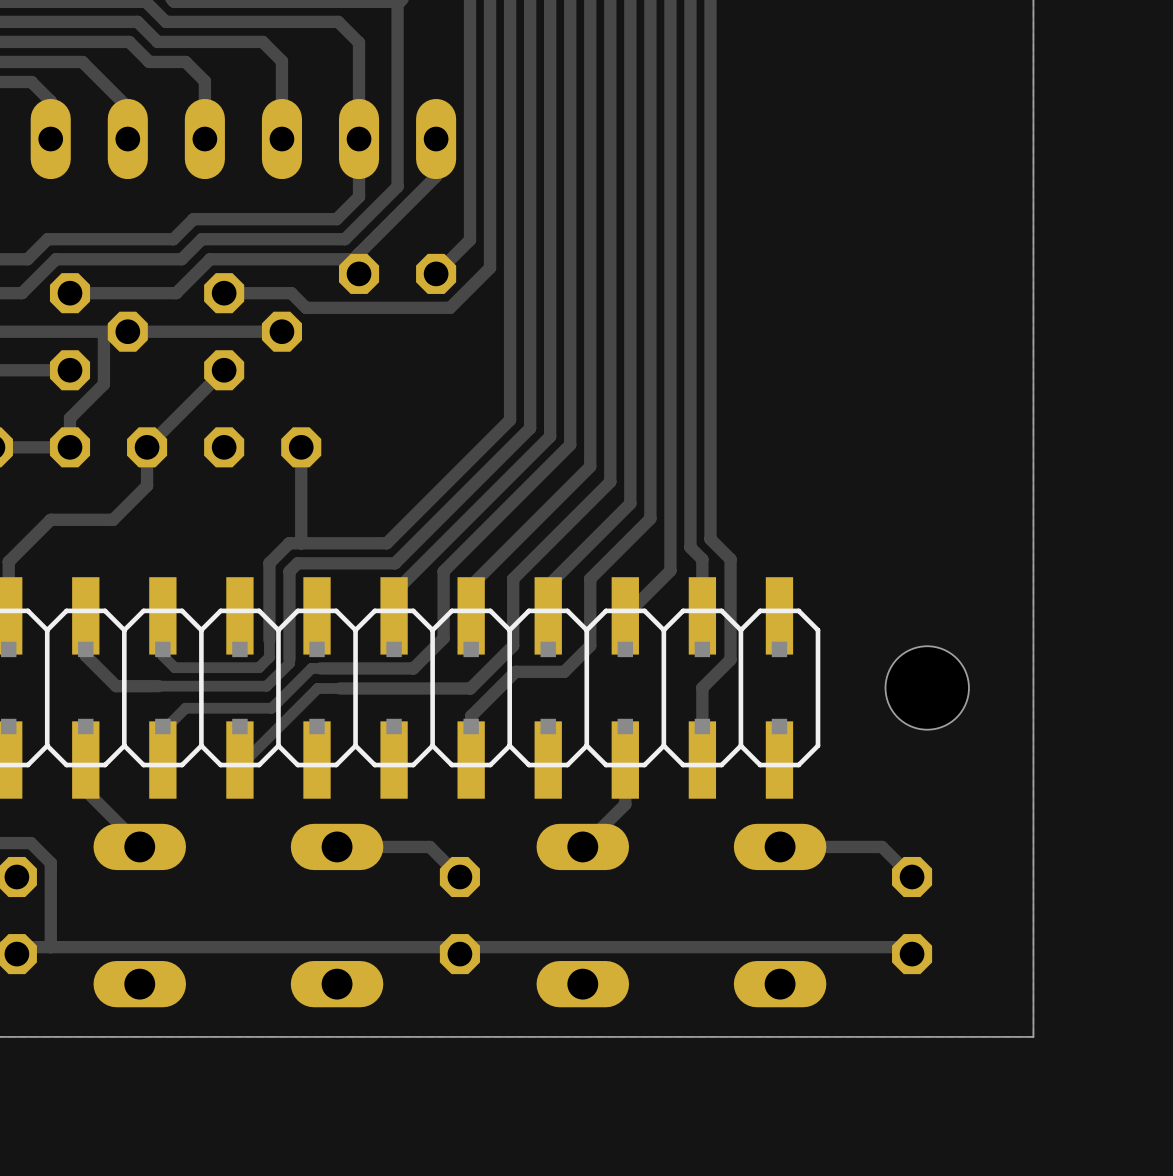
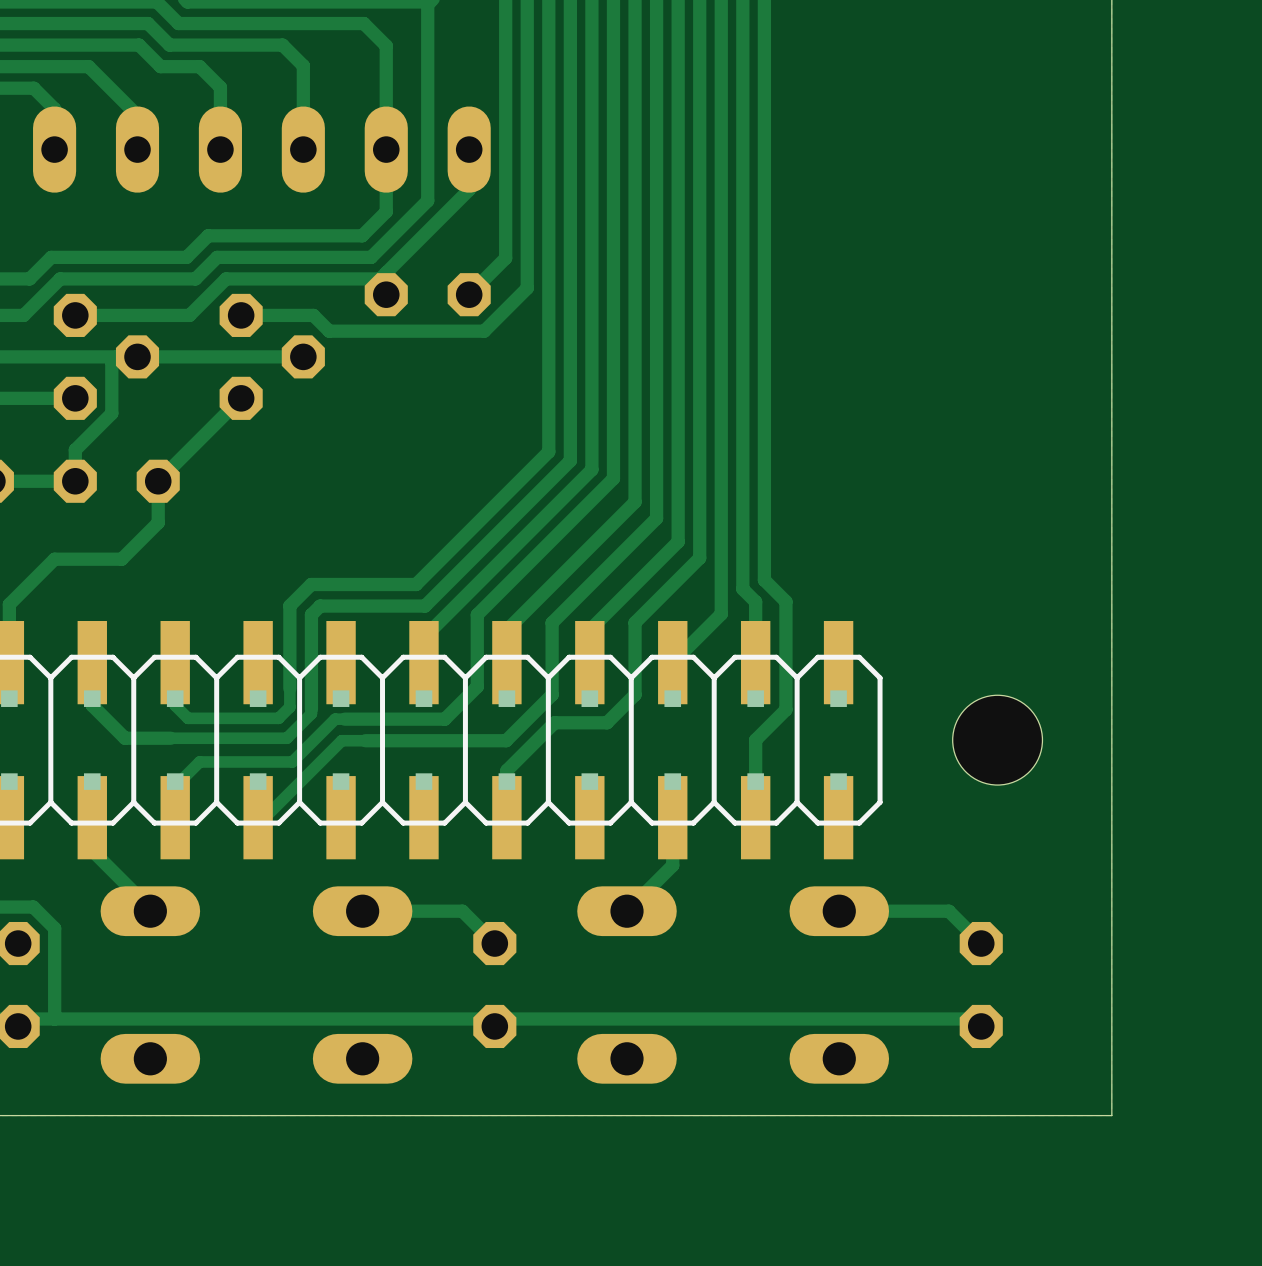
part: (262, 447) -> none
track: (301, 447) (301, 543) -> none

